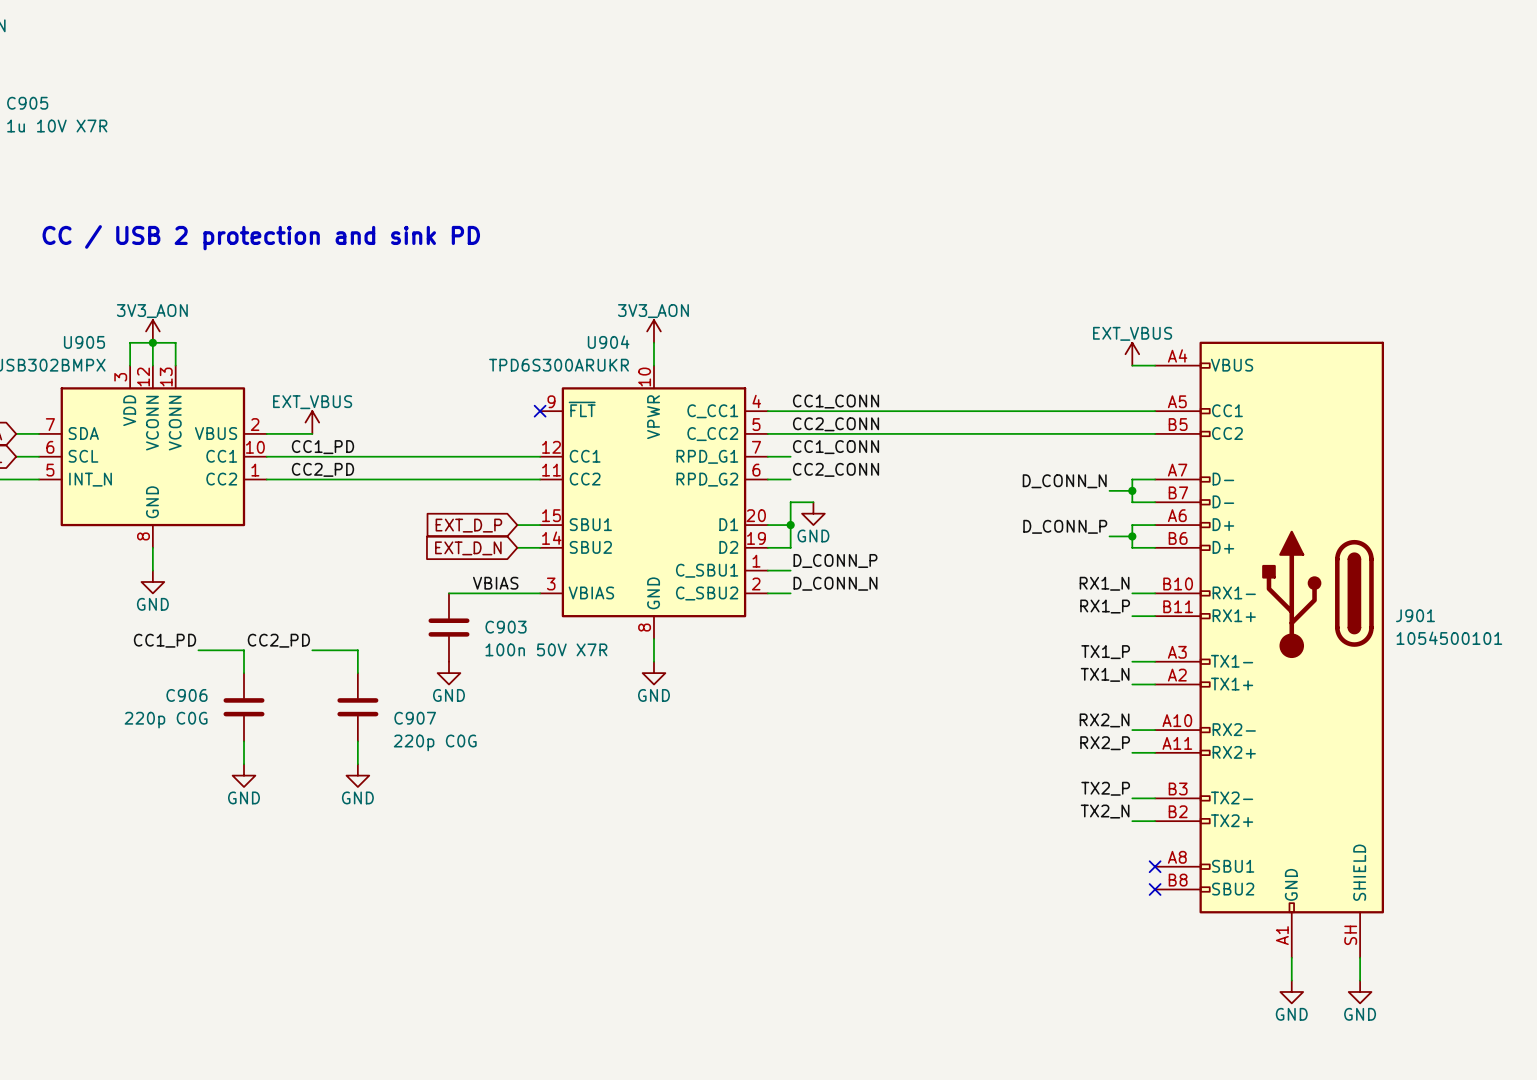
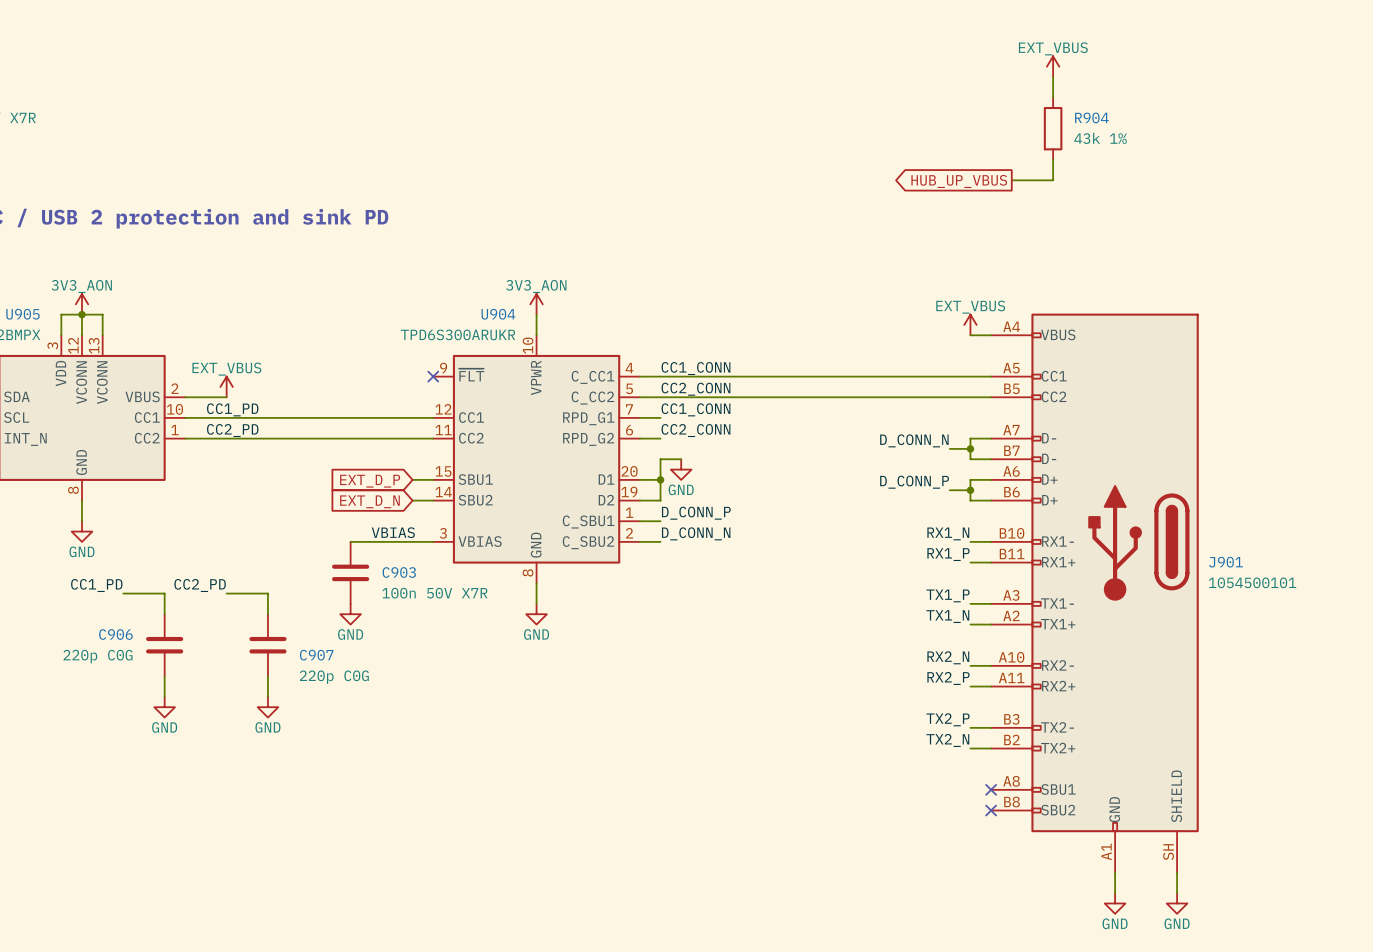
power symbol: none -> EXT_VBUS (1053, 66)
wire: none -> (1053, 77) (1053, 97)
R904: none -> 43k 1% (1053, 128)
wire: none -> (1053, 159) (1053, 180) (1011, 180)
global label: none -> HUB_UP_VBUS (959, 181)

